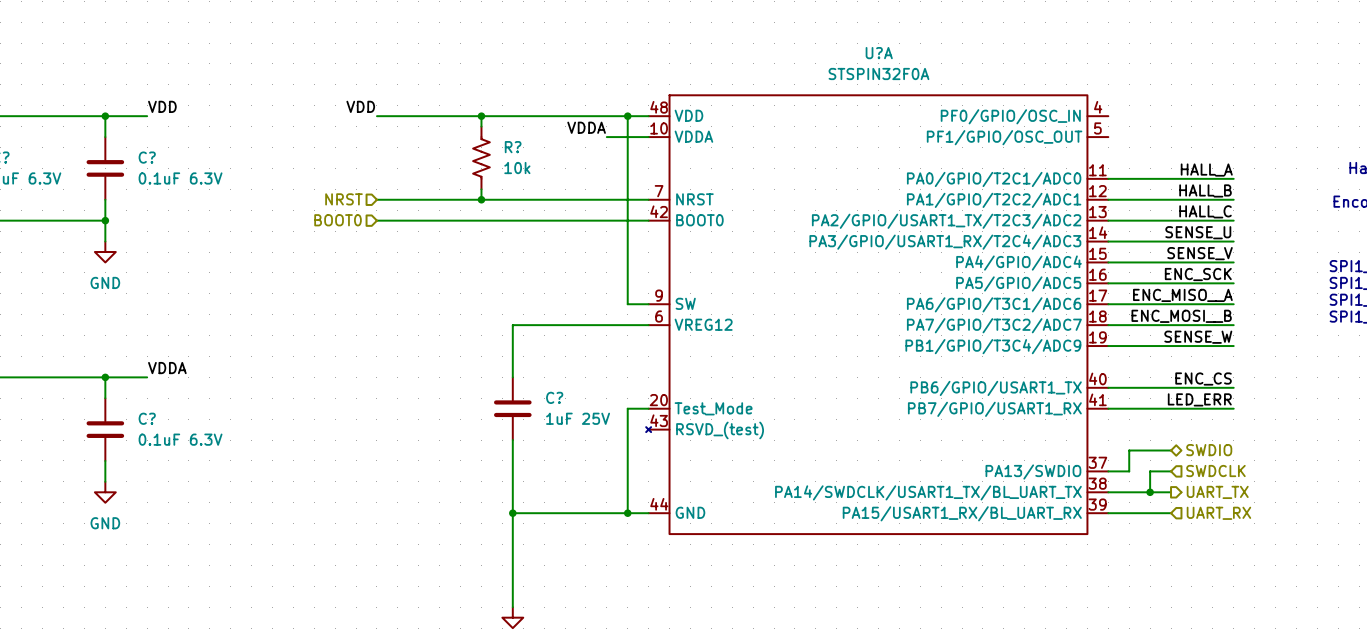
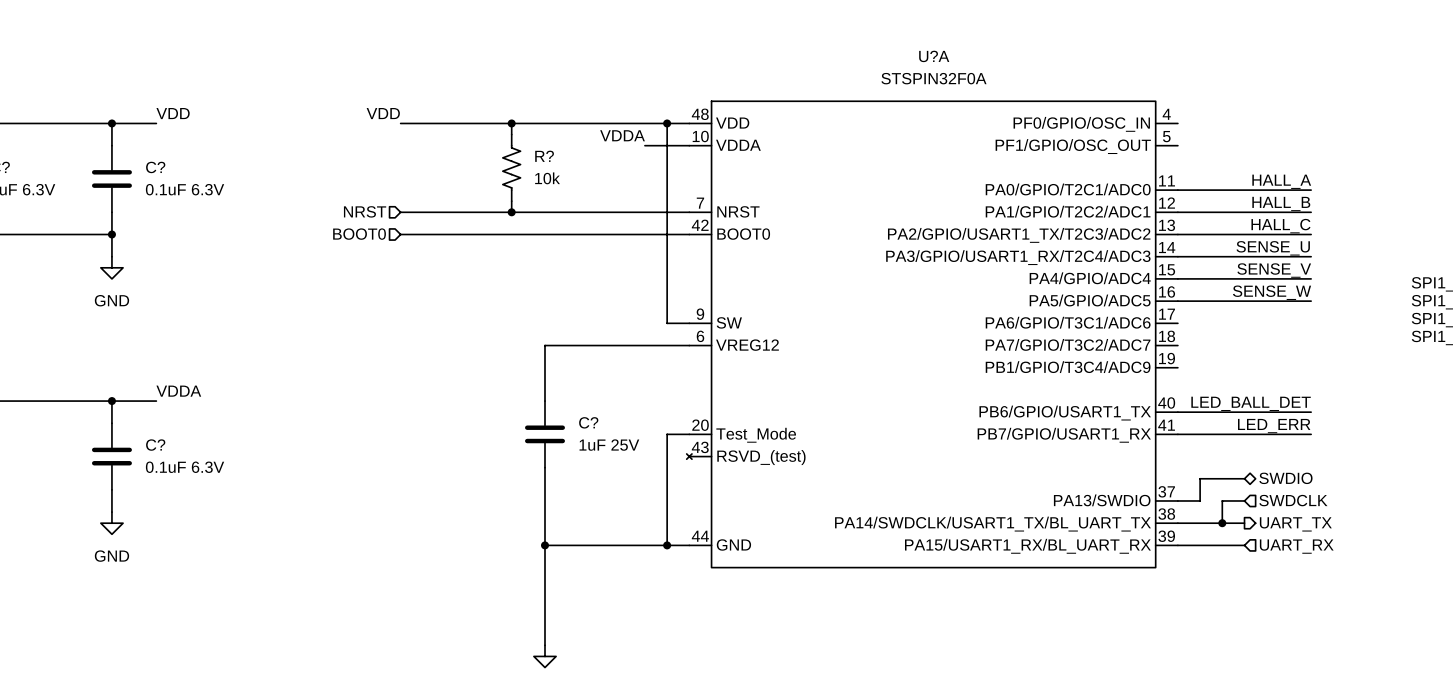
label: ENC_SCK (1198, 274) -> SENSE_W (1272, 292)
label: ENC_MISO__A (1182, 295) -> none
wire: (1108, 304) (1233, 304) -> none
label: ENC_MOSI__B (1181, 316) -> none
wire: (1108, 325) (1233, 325) -> none
label: SENSE_W (1198, 337) -> none
wire: (1108, 346) (1233, 346) -> none
label: ENC_CS (1203, 378) -> LED_BALL_DET (1251, 403)

